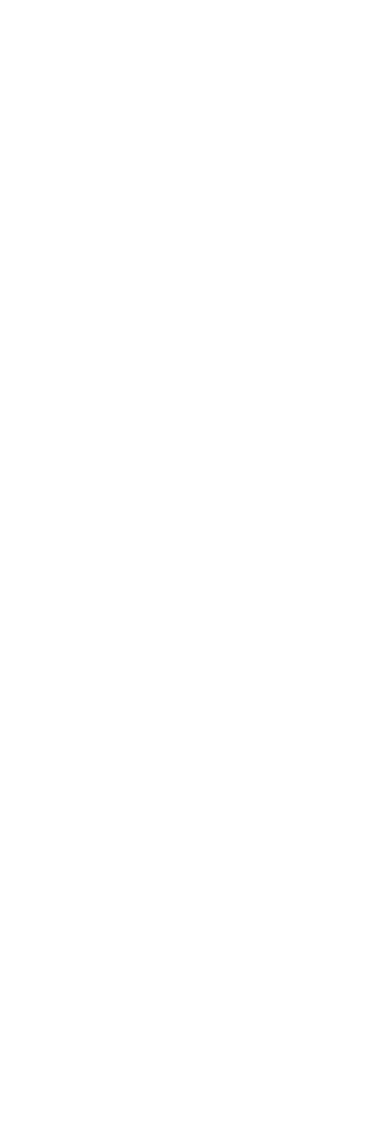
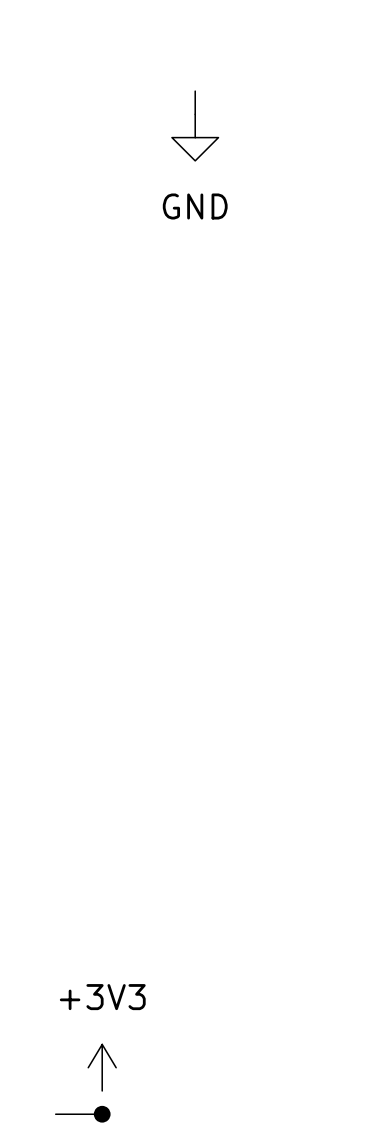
wire: none -> (195, 91) (195, 114)
power symbol: none -> GND (195, 137)
power symbol: none -> +3V3 (102, 1067)
wire: none -> (55, 1114) (102, 1114)
junction: none -> (102, 1114)

